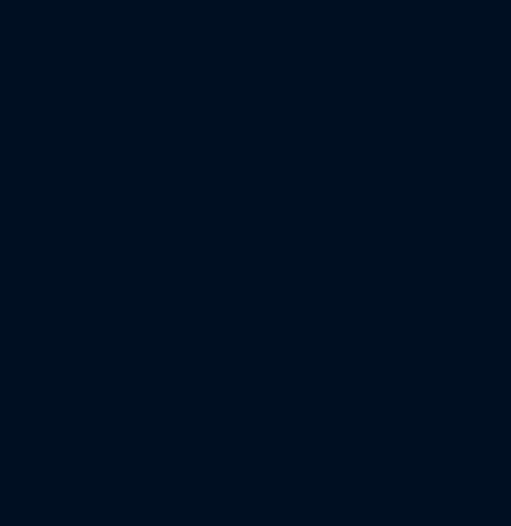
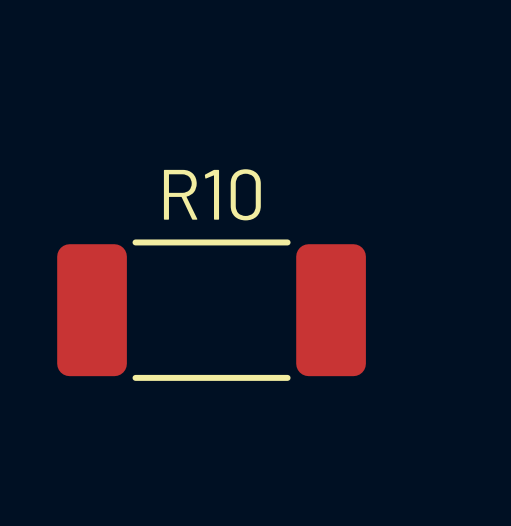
R10: none -> (211, 310)

